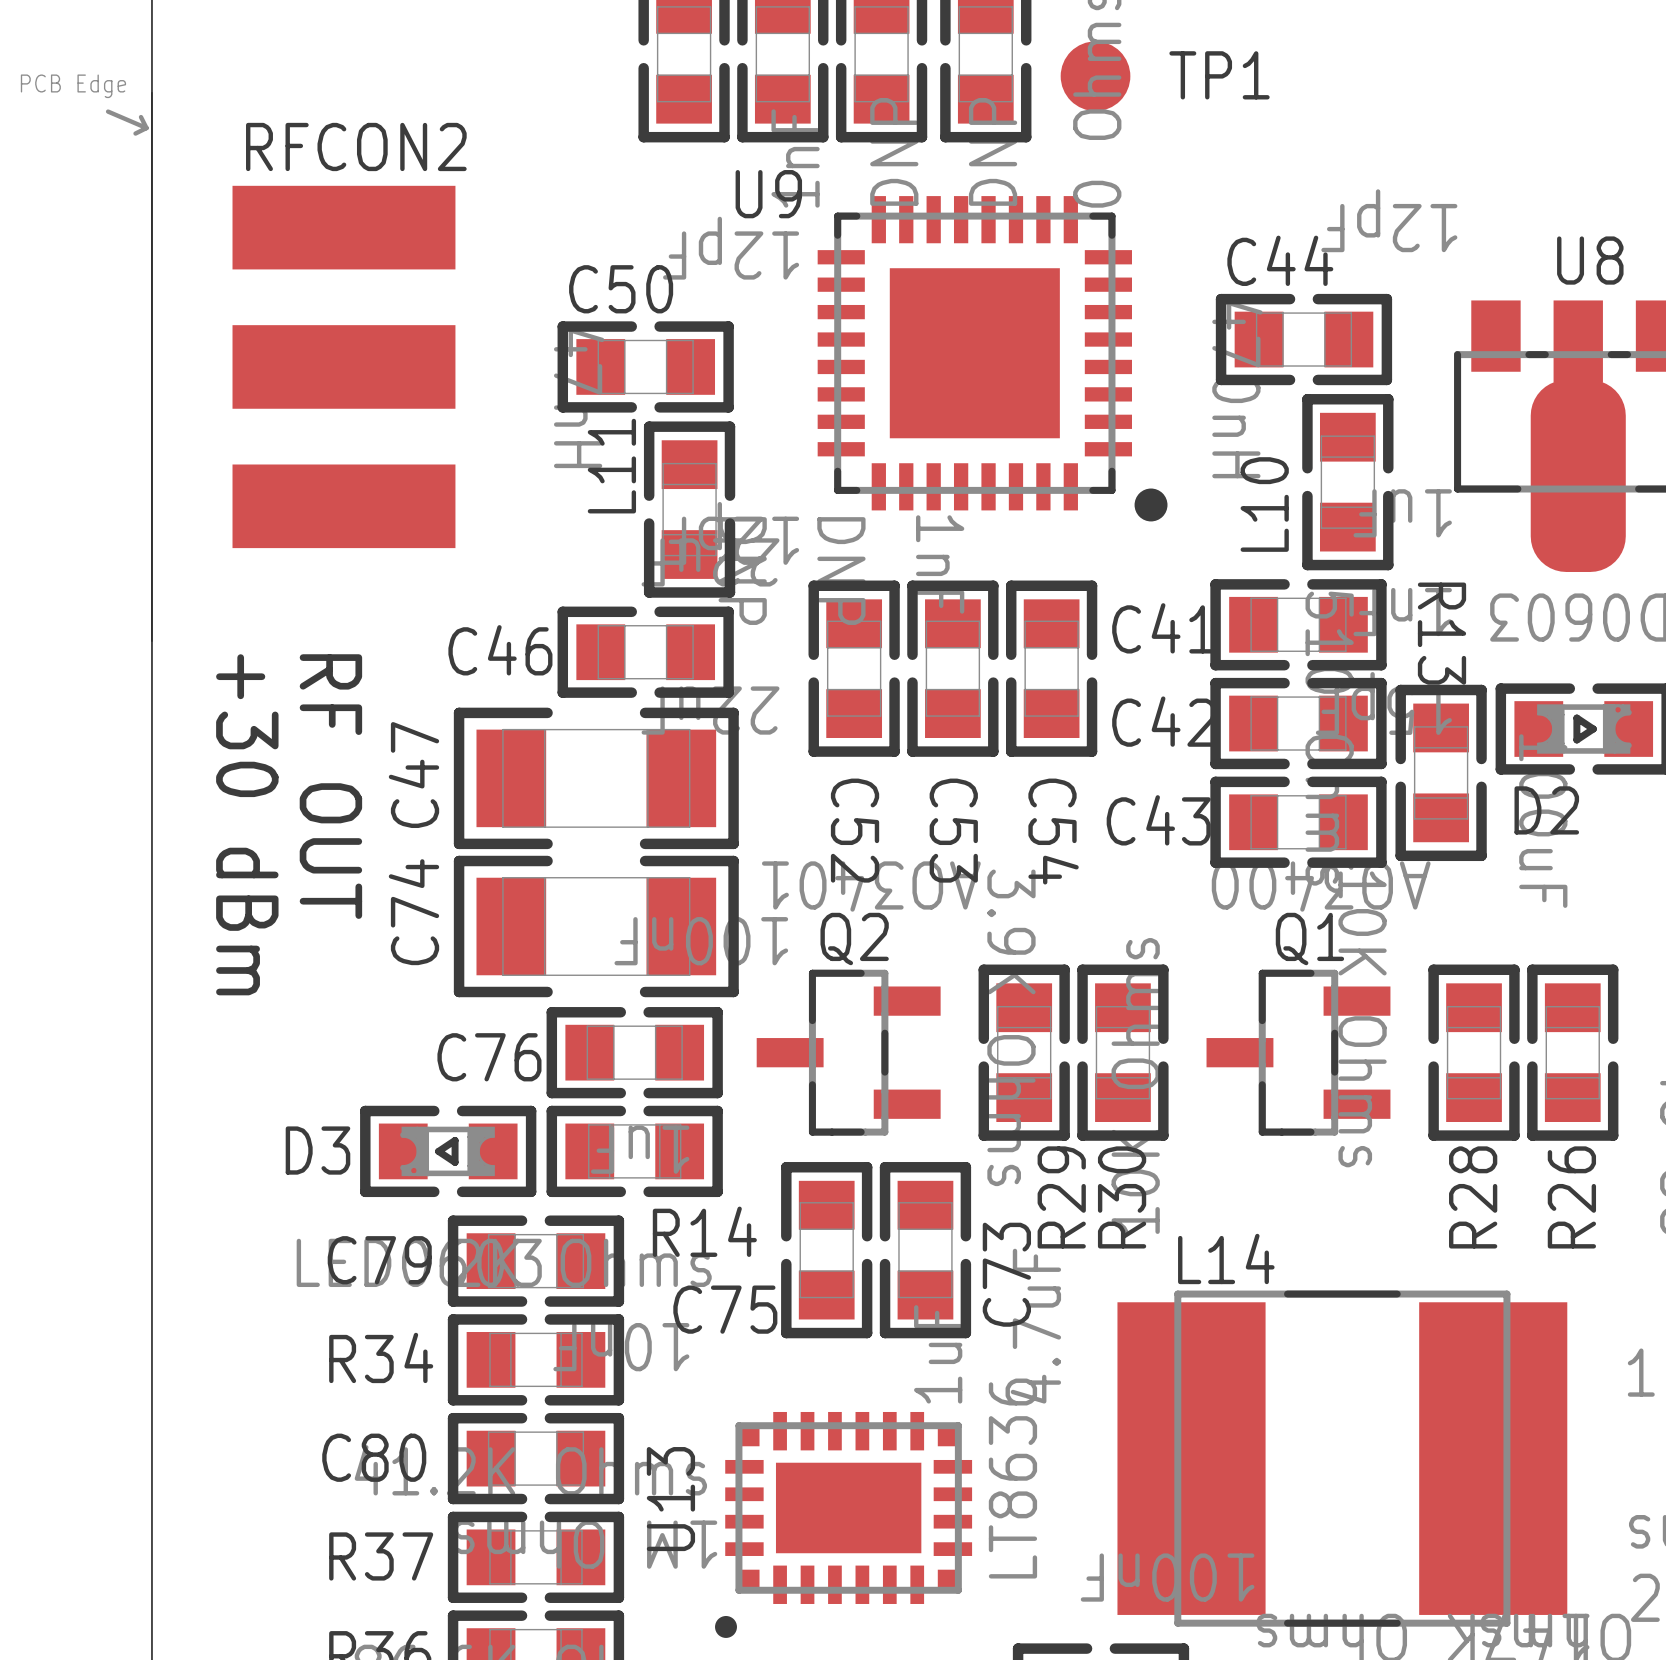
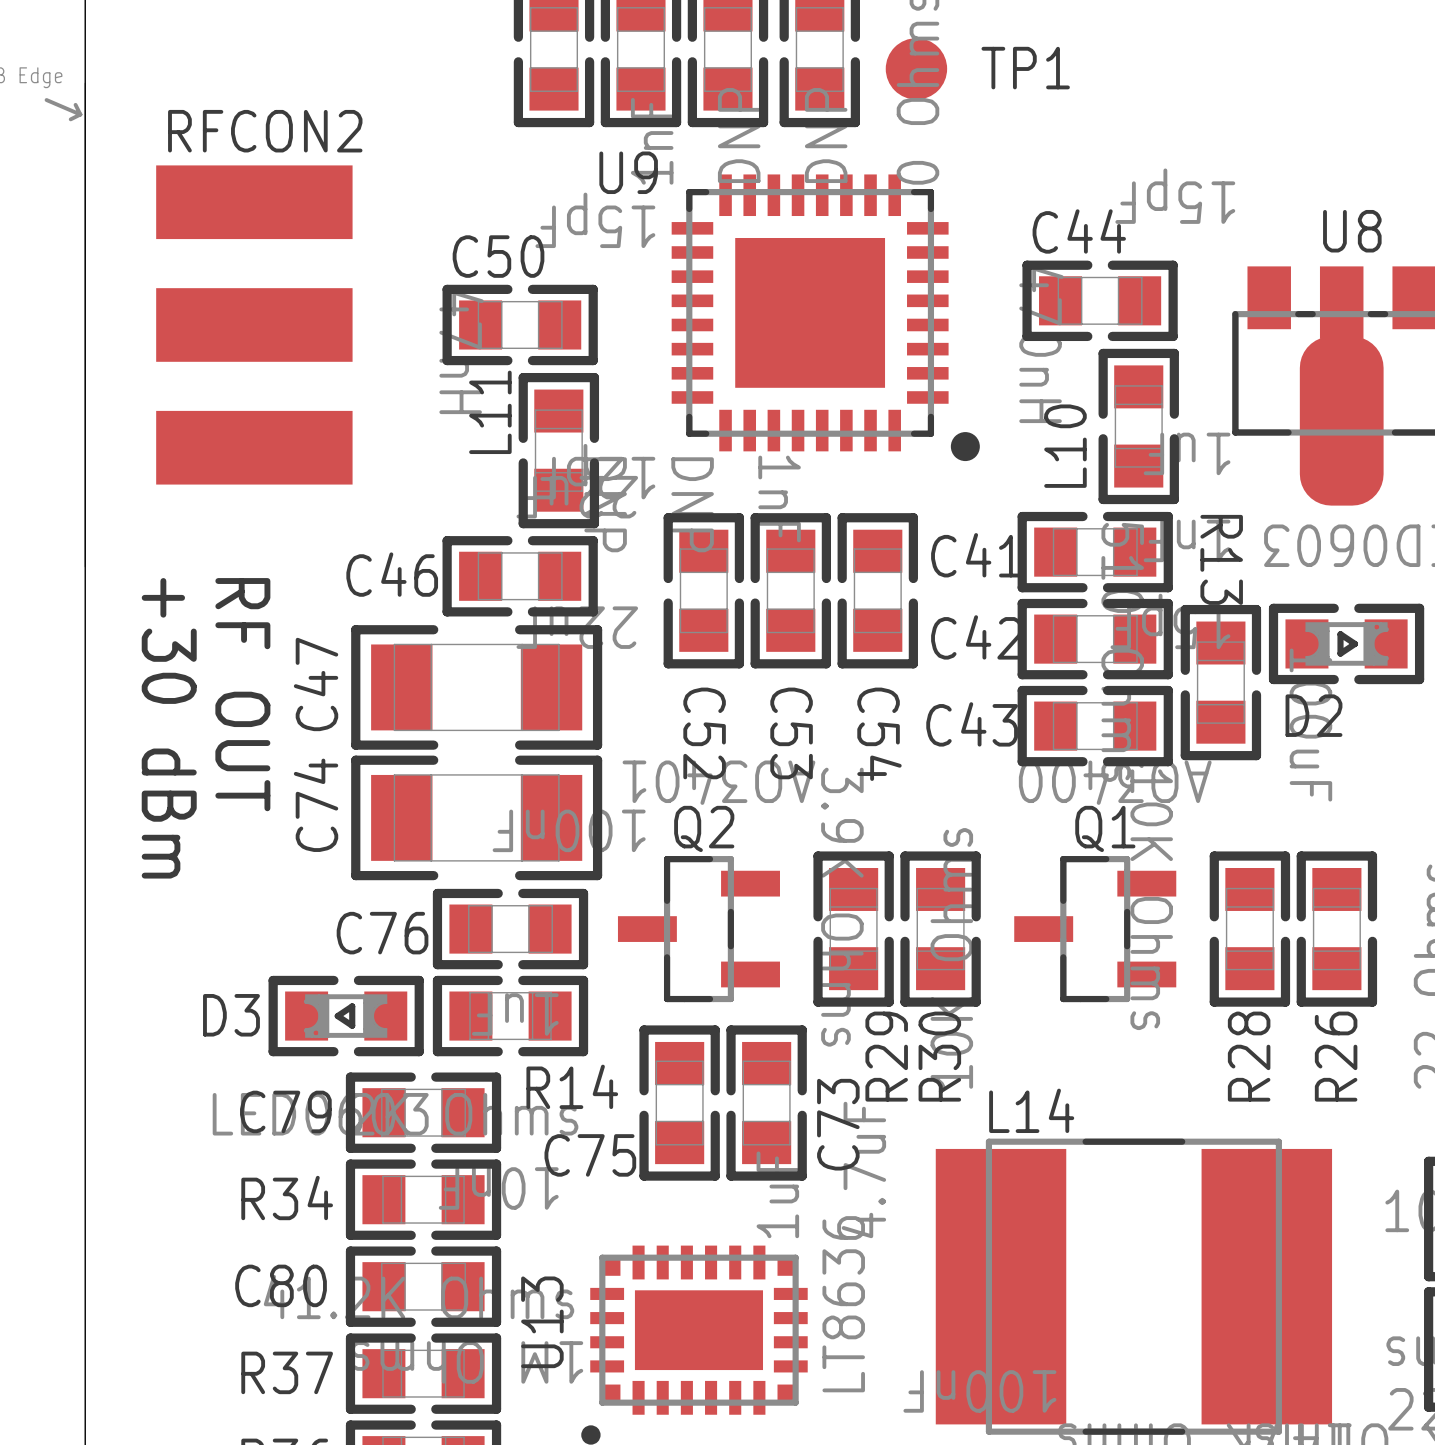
C44 value: 12pF (1389, 220) -> 15pF (1175, 196)
C50 value: 12pF (731, 248) -> 15pF (595, 220)

